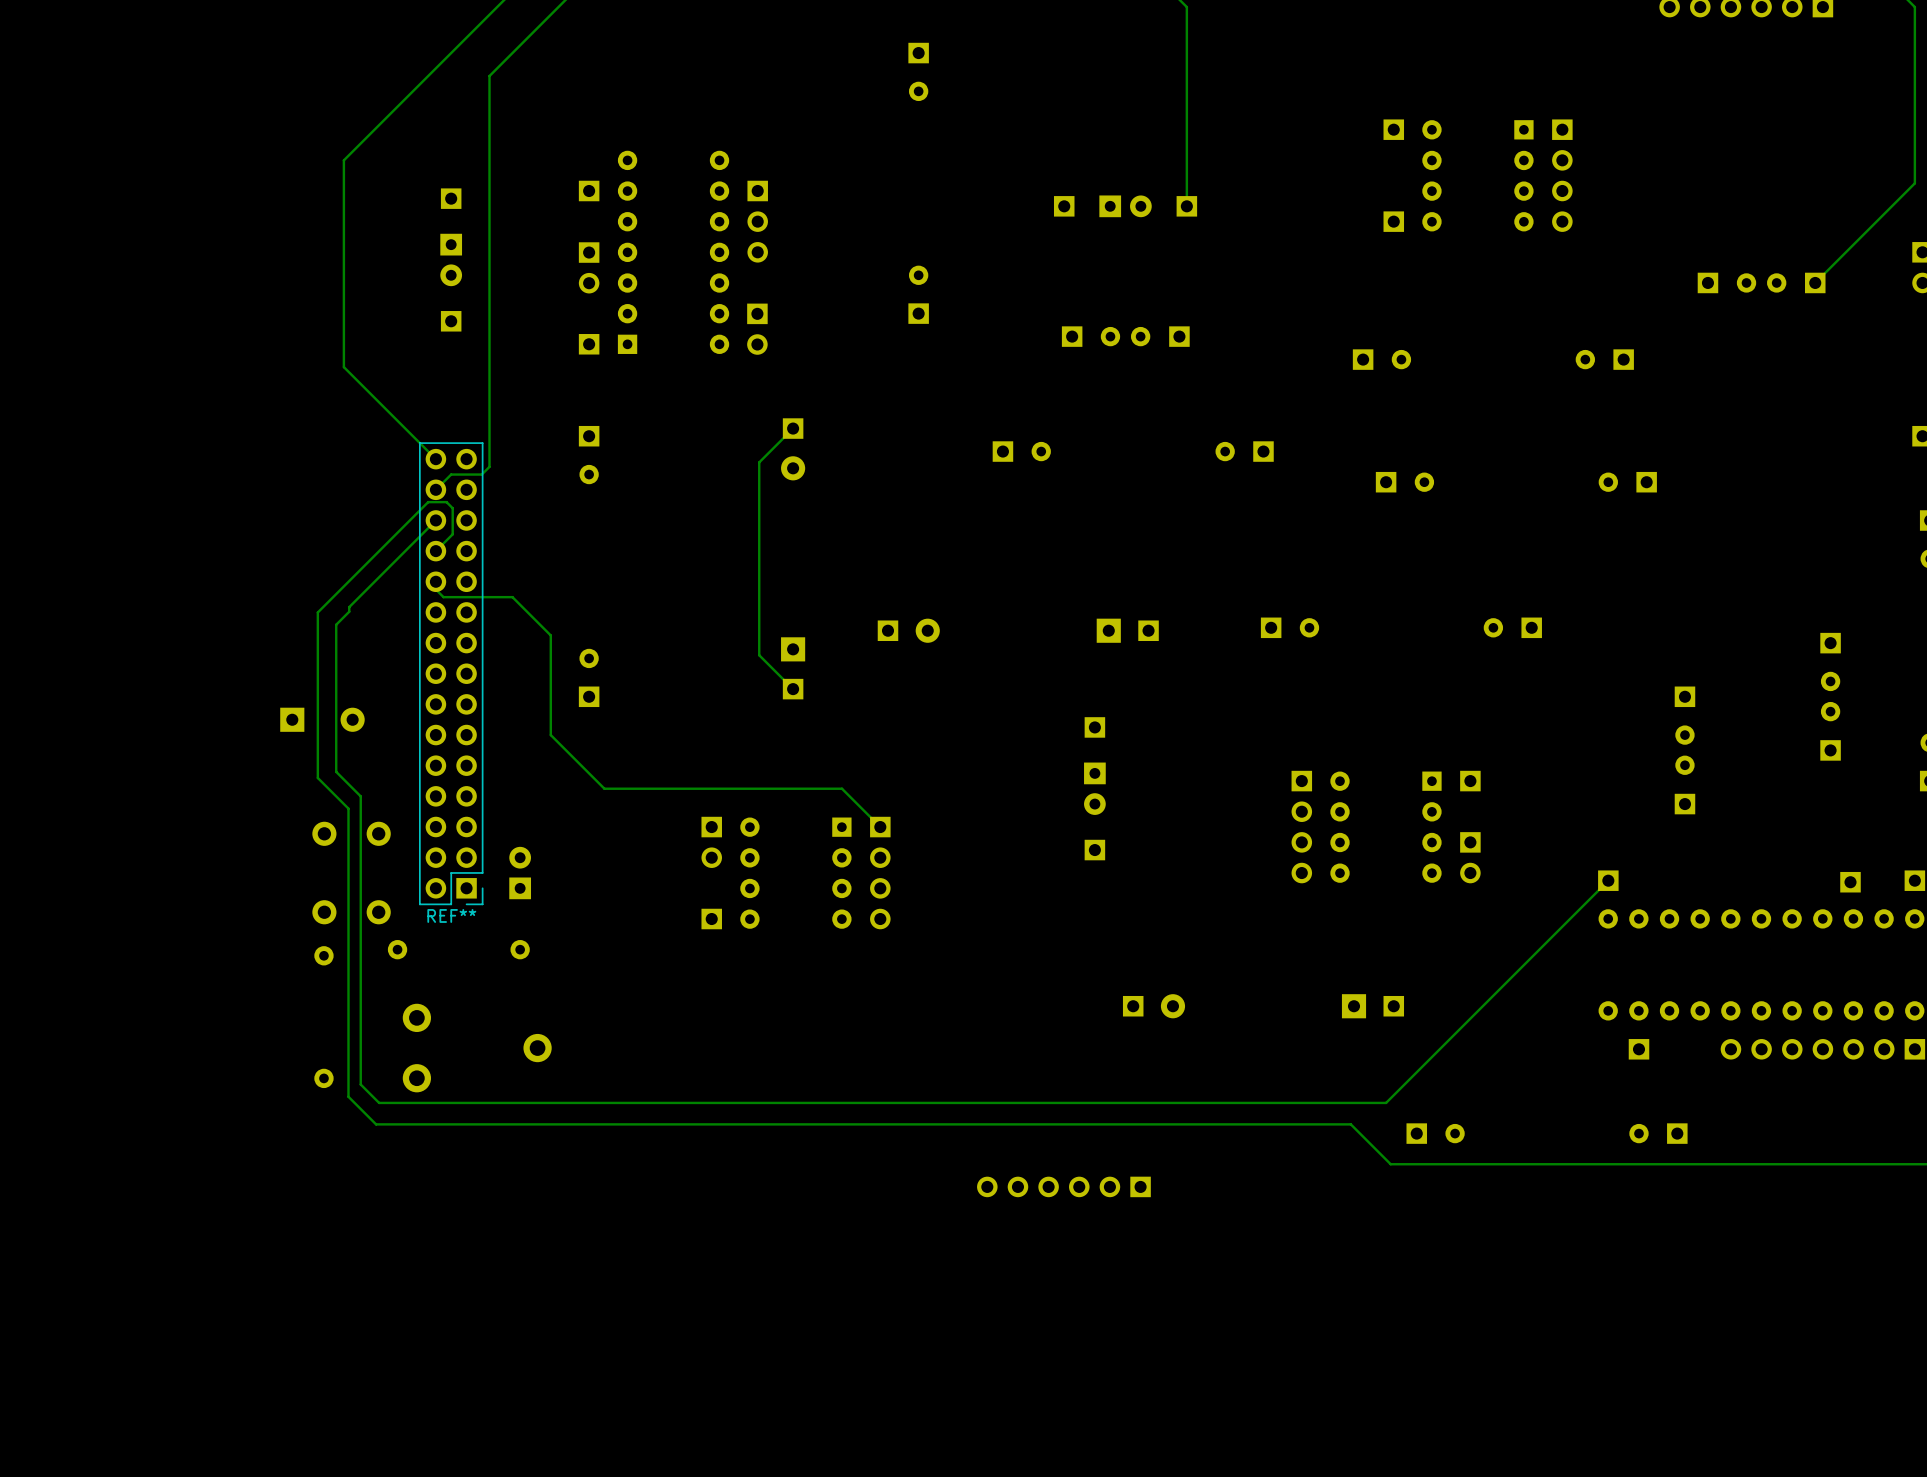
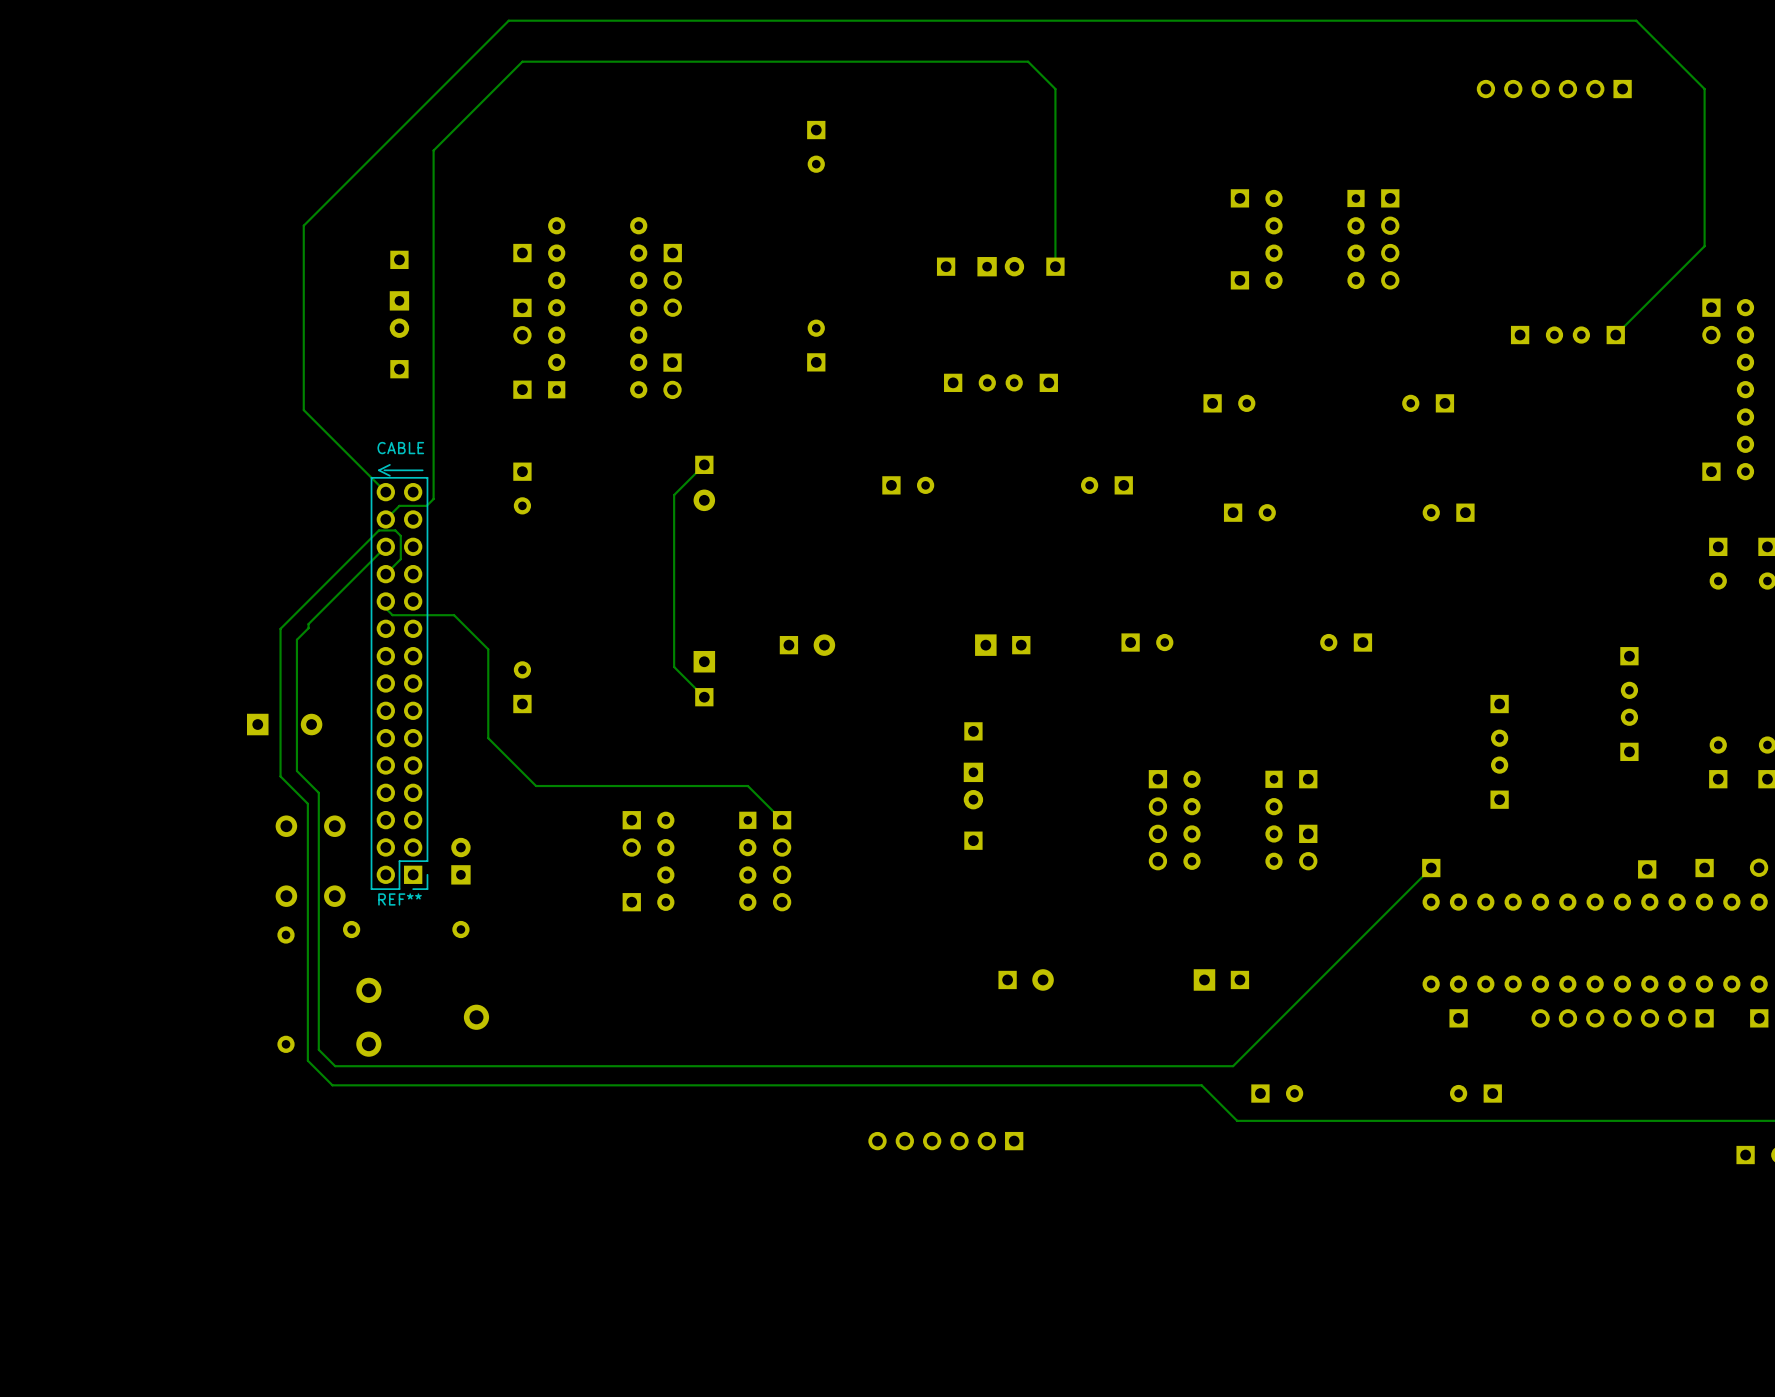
text: none -> CABLE (400, 448)
line: none -> (389, 464) (378, 470) (389, 475)
line: none -> (422, 470) (384, 470)

